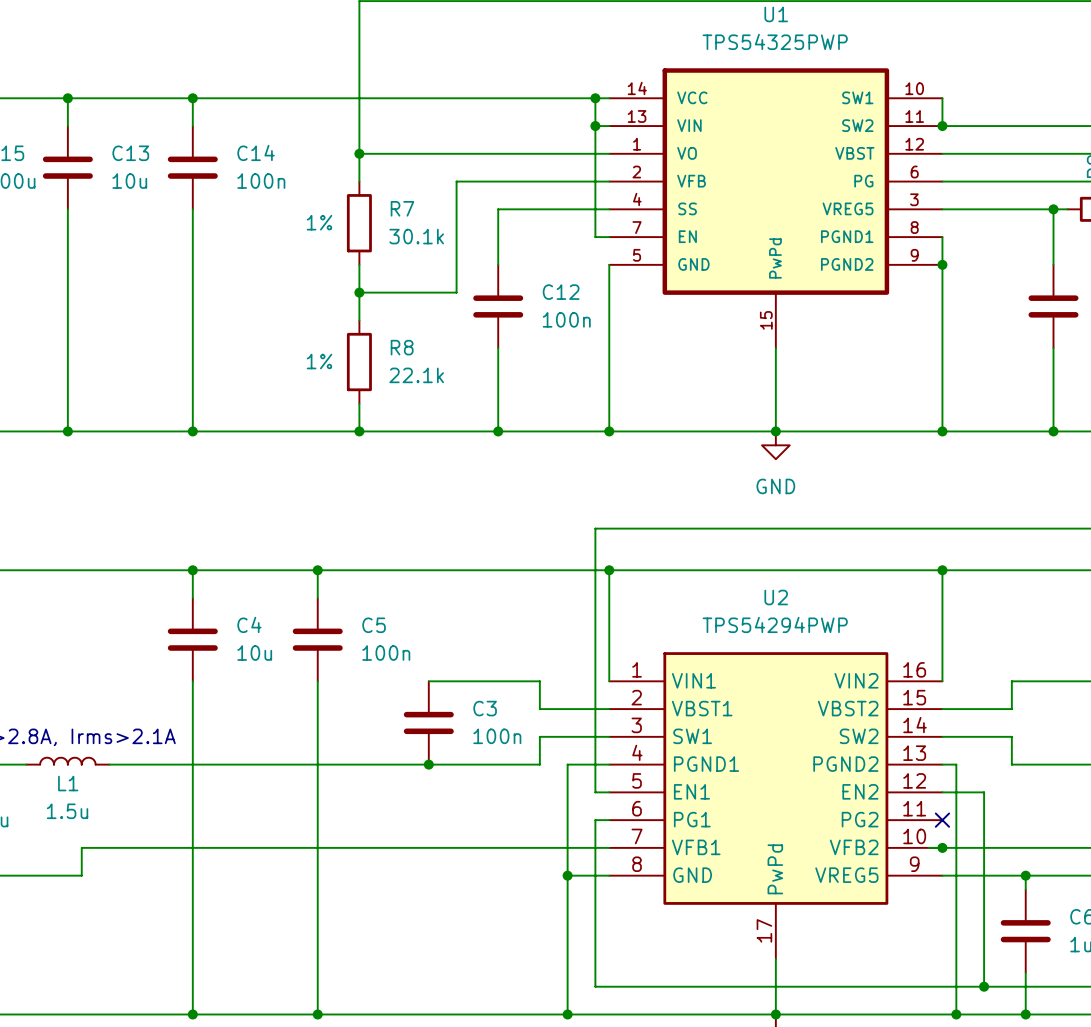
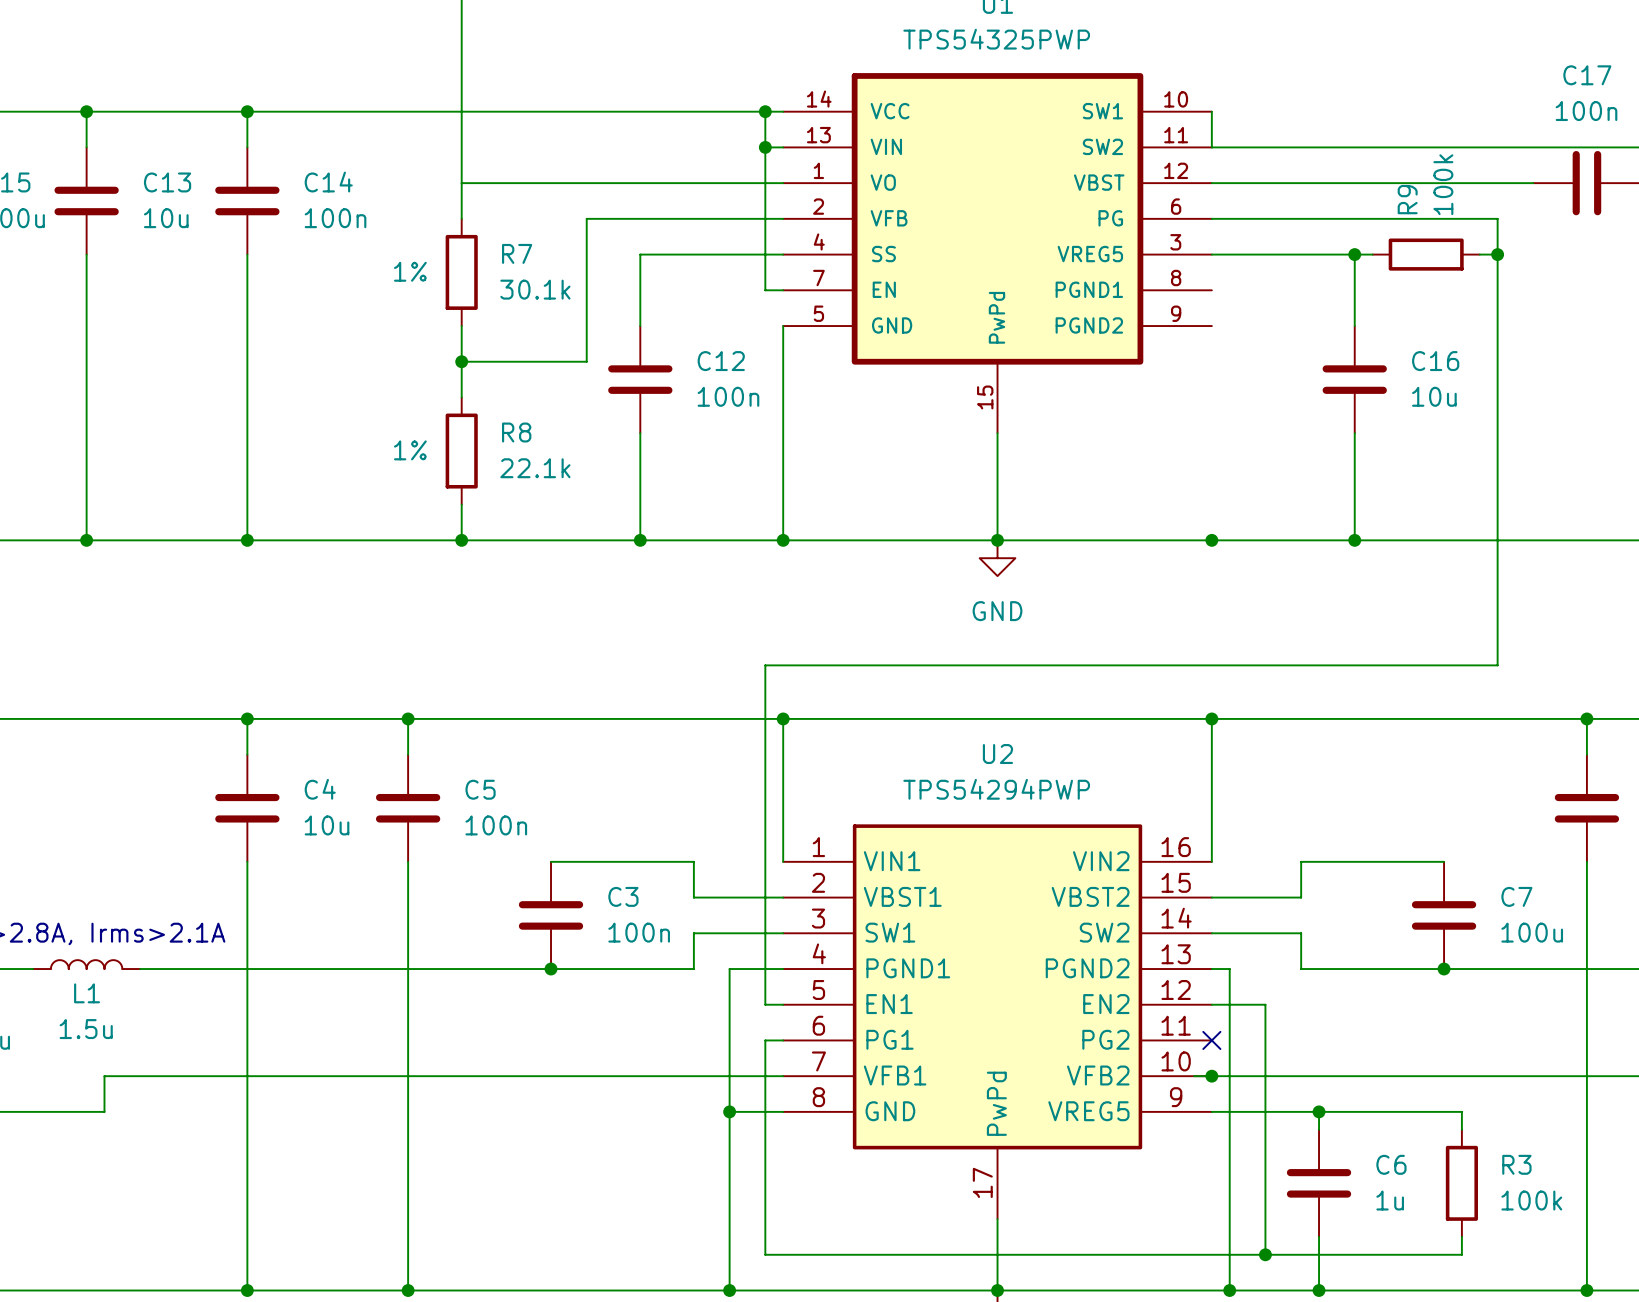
junction: (942, 126) -> none
junction: (359, 153) -> none
wire: (942, 237) (942, 431) -> none
junction: (942, 264) -> none

